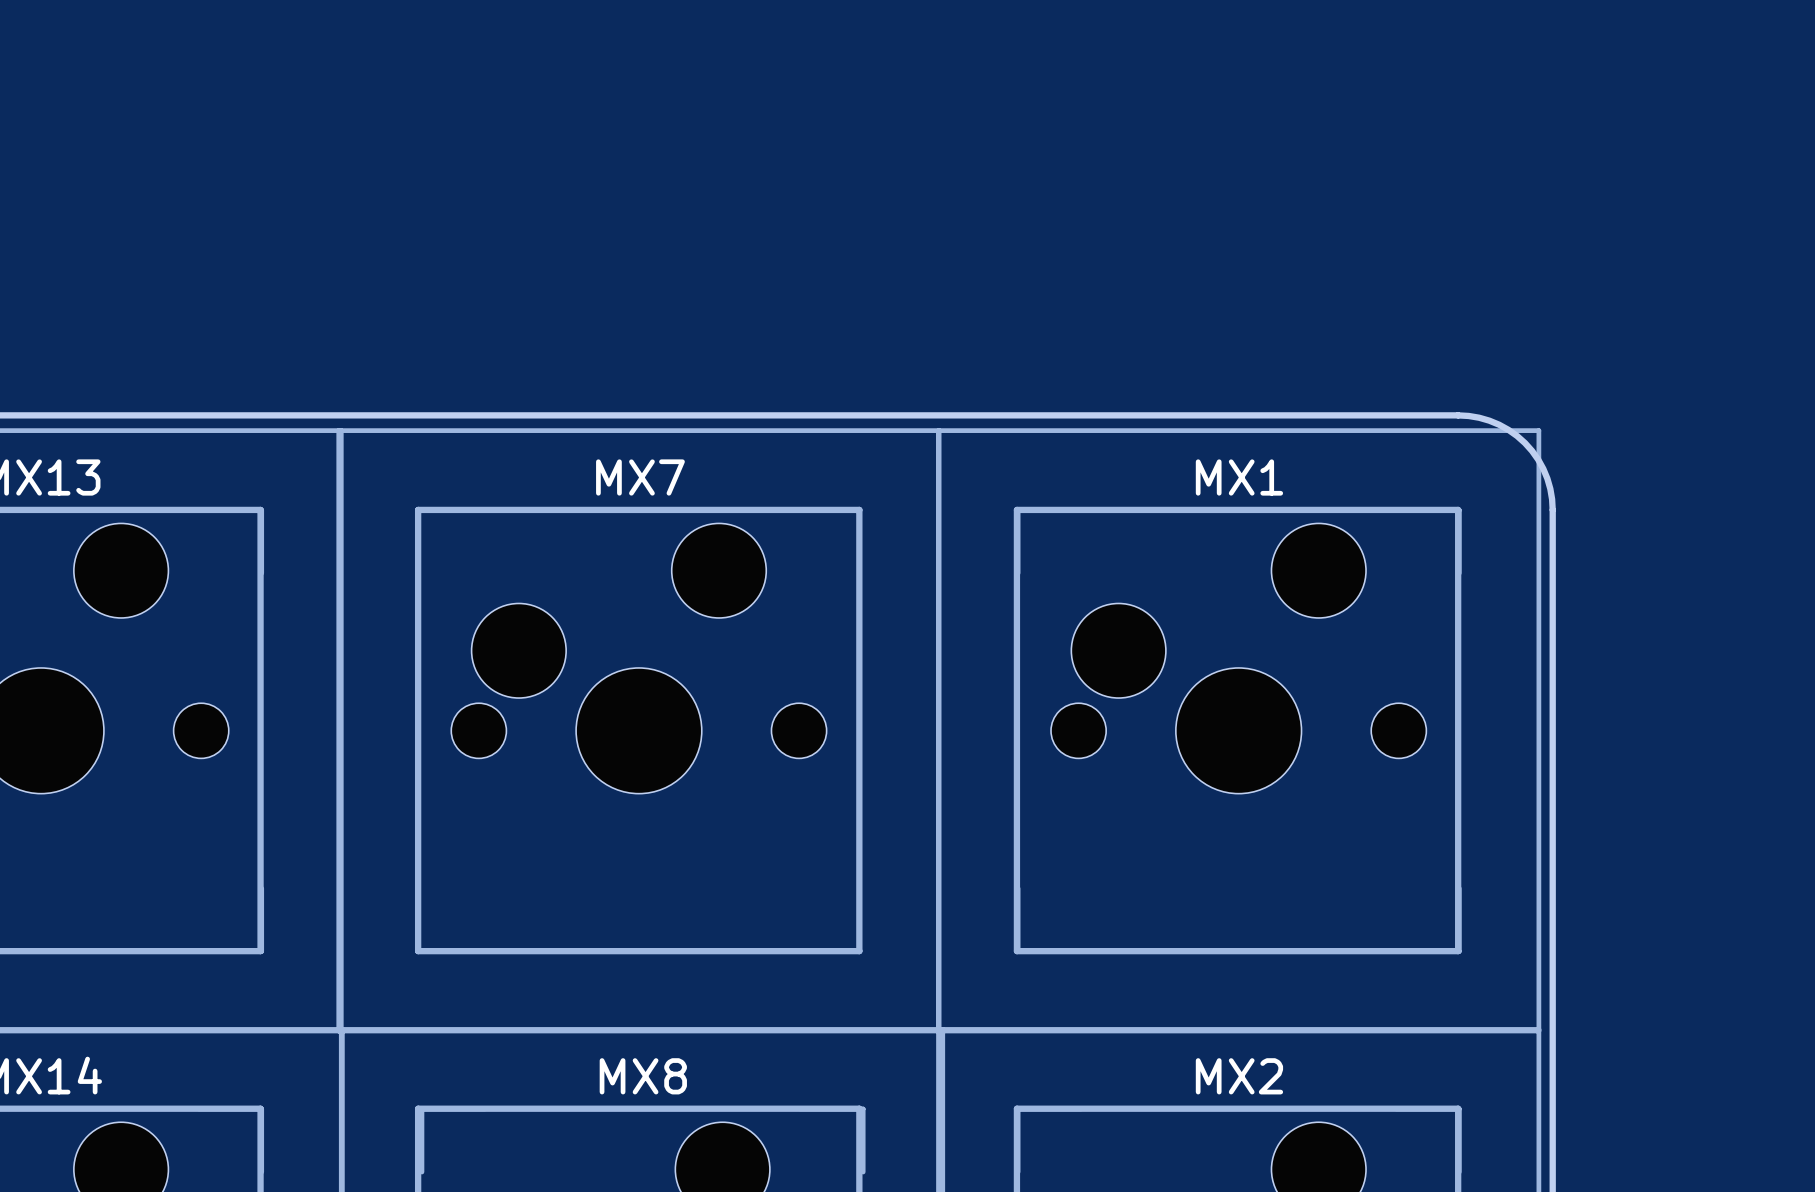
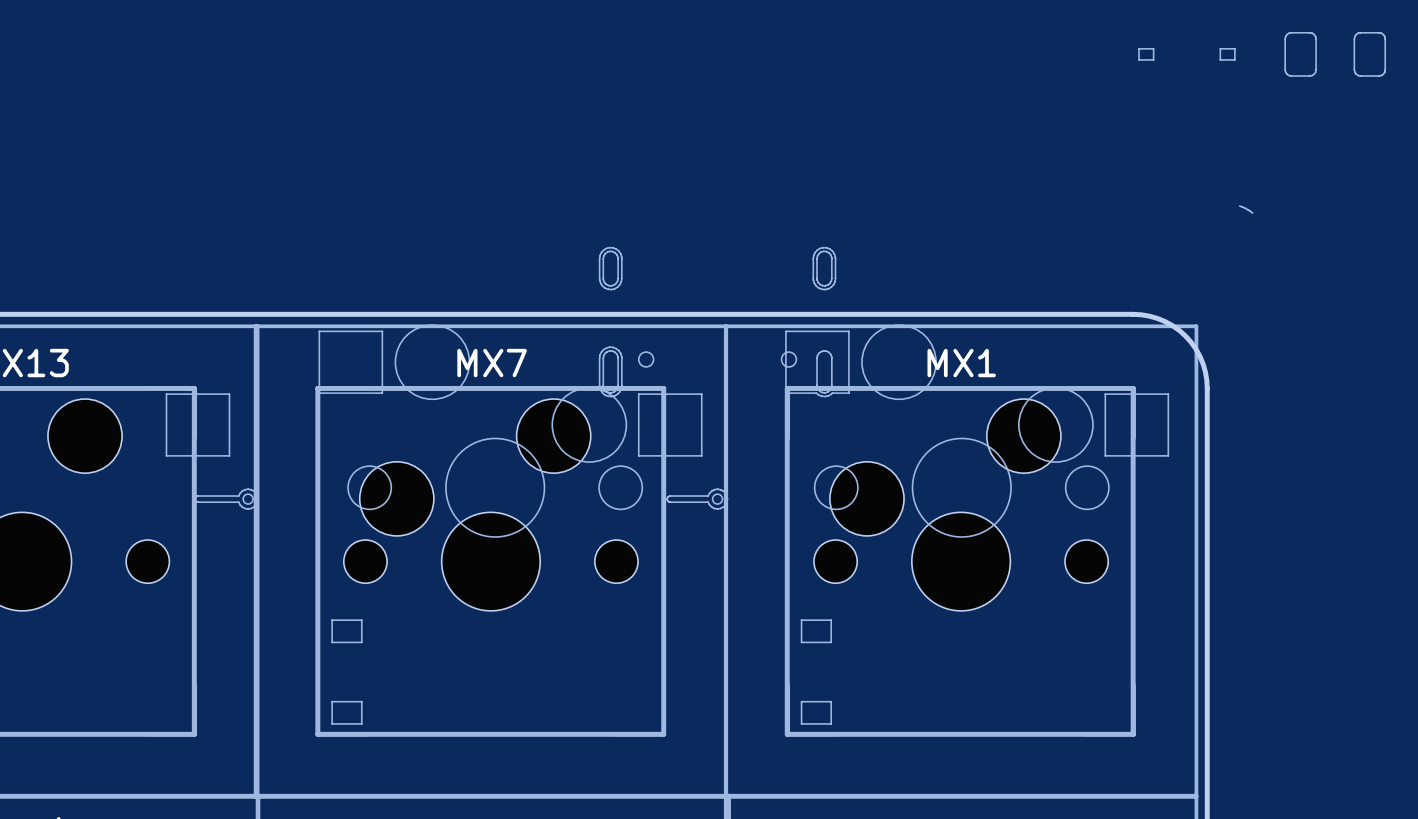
line: none -> (1291, 32) (1286, 34) (1285, 38) (1285, 72) (1291, 76) (1312, 75) (1316, 69) (1315, 36) (1309, 32) (1291, 32)
line: none -> (1360, 32) (1356, 34) (1354, 38) (1354, 72) (1360, 76) (1381, 75) (1385, 69) (1384, 36) (1379, 32) (1360, 32)
line: none -> (1139, 48) (1139, 59) (1153, 59) (1153, 48) (1139, 48)
line: none -> (1220, 48) (1220, 59) (1234, 59) (1234, 48) (1220, 48)
line: none -> (1239, 206) (1247, 209)
line: none -> (1247, 209) (1252, 213)
line: none -> (609, 247) (618, 251) (621, 258) (621, 281) (617, 287) (611, 289) (602, 286) (599, 278) (600, 255) (603, 250) (609, 247)
line: none -> (823, 247) (817, 250) (813, 255) (813, 278) (816, 286) (825, 289) (831, 287) (835, 281) (835, 258) (832, 251) (823, 247)
line: none -> (609, 251) (603, 256) (603, 278) (606, 284) (611, 285) (617, 281) (618, 258) (615, 252) (609, 251)
line: none -> (823, 251) (817, 256) (816, 278) (819, 284) (825, 285) (831, 281) (831, 258) (828, 252) (823, 251)
drawing: none -> [394, 324, 471, 400]
drawing: none -> [861, 324, 937, 400]
line: none -> (319, 331) (382, 331) (382, 393) (319, 393) (319, 331)
line: none -> (785, 331) (848, 331) (848, 393) (832, 393) (825, 396) (816, 393) (785, 393) (785, 331)
line: none -> (609, 347) (603, 349) (600, 355) (599, 385) (602, 393) (611, 396) (617, 394) (621, 388) (621, 358) (618, 350) (609, 347)
drawing: none -> [445, 351, 655, 538]
line: none -> (609, 350) (603, 355) (603, 385) (606, 391) (611, 392) (617, 388) (618, 358) (615, 352) (609, 350)
drawing: none -> [780, 351, 797, 368]
line: none -> (823, 350) (828, 352) (831, 358) (831, 388) (825, 392) (819, 391) (816, 385) (817, 355) (823, 350)
drawing: none -> [911, 387, 1110, 538]
line: none -> (166, 394) (229, 394) (229, 455) (166, 455) (166, 394)
line: none -> (638, 394) (701, 394) (701, 455) (638, 455) (638, 394)
line: none -> (1105, 394) (1168, 394) (1168, 455) (1105, 455) (1105, 394)
drawing: none -> [347, 465, 392, 510]
drawing: none -> [814, 465, 859, 510]
line: none -> (248, 489) (242, 491) (238, 496) (197, 496) (195, 500) (197, 502) (238, 502) (245, 508) (251, 508) (256, 504) (258, 499) (253, 491) (248, 489)
line: none -> (717, 489) (725, 493) (727, 499) (725, 504) (720, 508) (714, 508) (708, 502) (670, 502) (667, 500) (670, 496) (708, 496) (711, 491) (717, 489)
drawing: none -> [242, 493, 254, 505]
drawing: none -> [711, 493, 724, 505]
line: none -> (332, 620) (361, 620) (361, 642) (332, 642) (332, 620)
line: none -> (801, 620) (831, 620) (831, 642) (801, 642) (801, 620)
line: none -> (332, 701) (361, 701) (361, 723) (332, 723) (332, 701)
line: none -> (801, 701) (831, 701) (831, 723) (801, 723) (801, 701)

